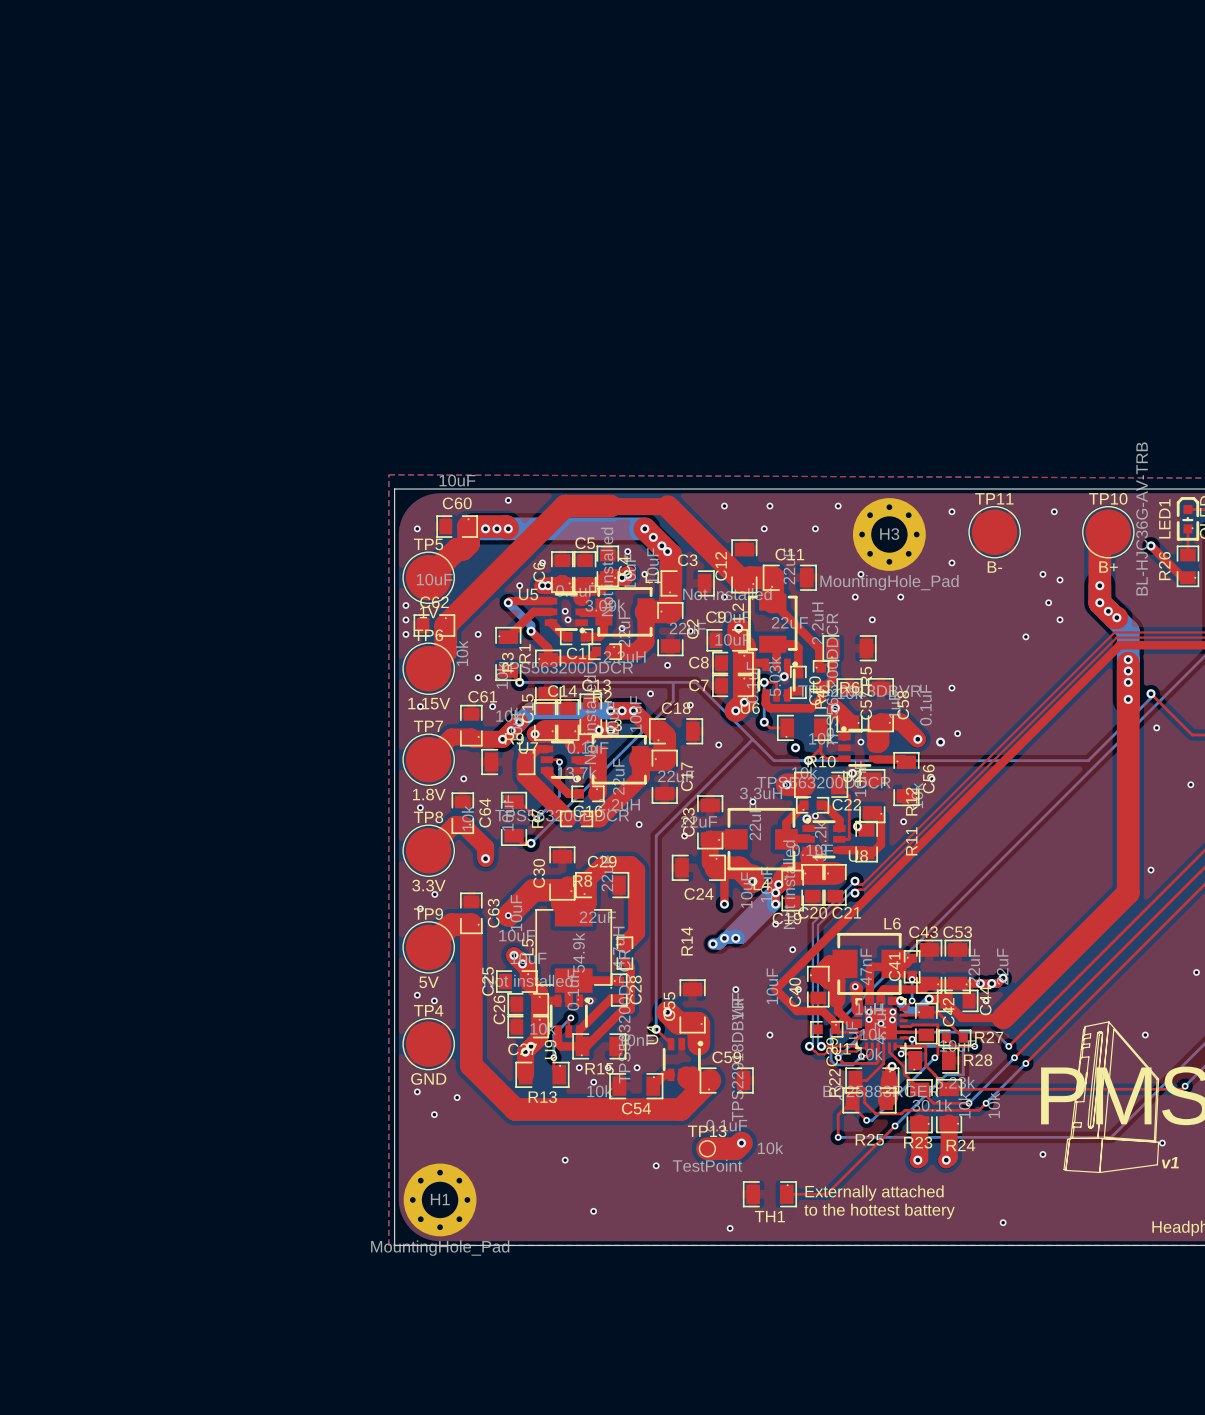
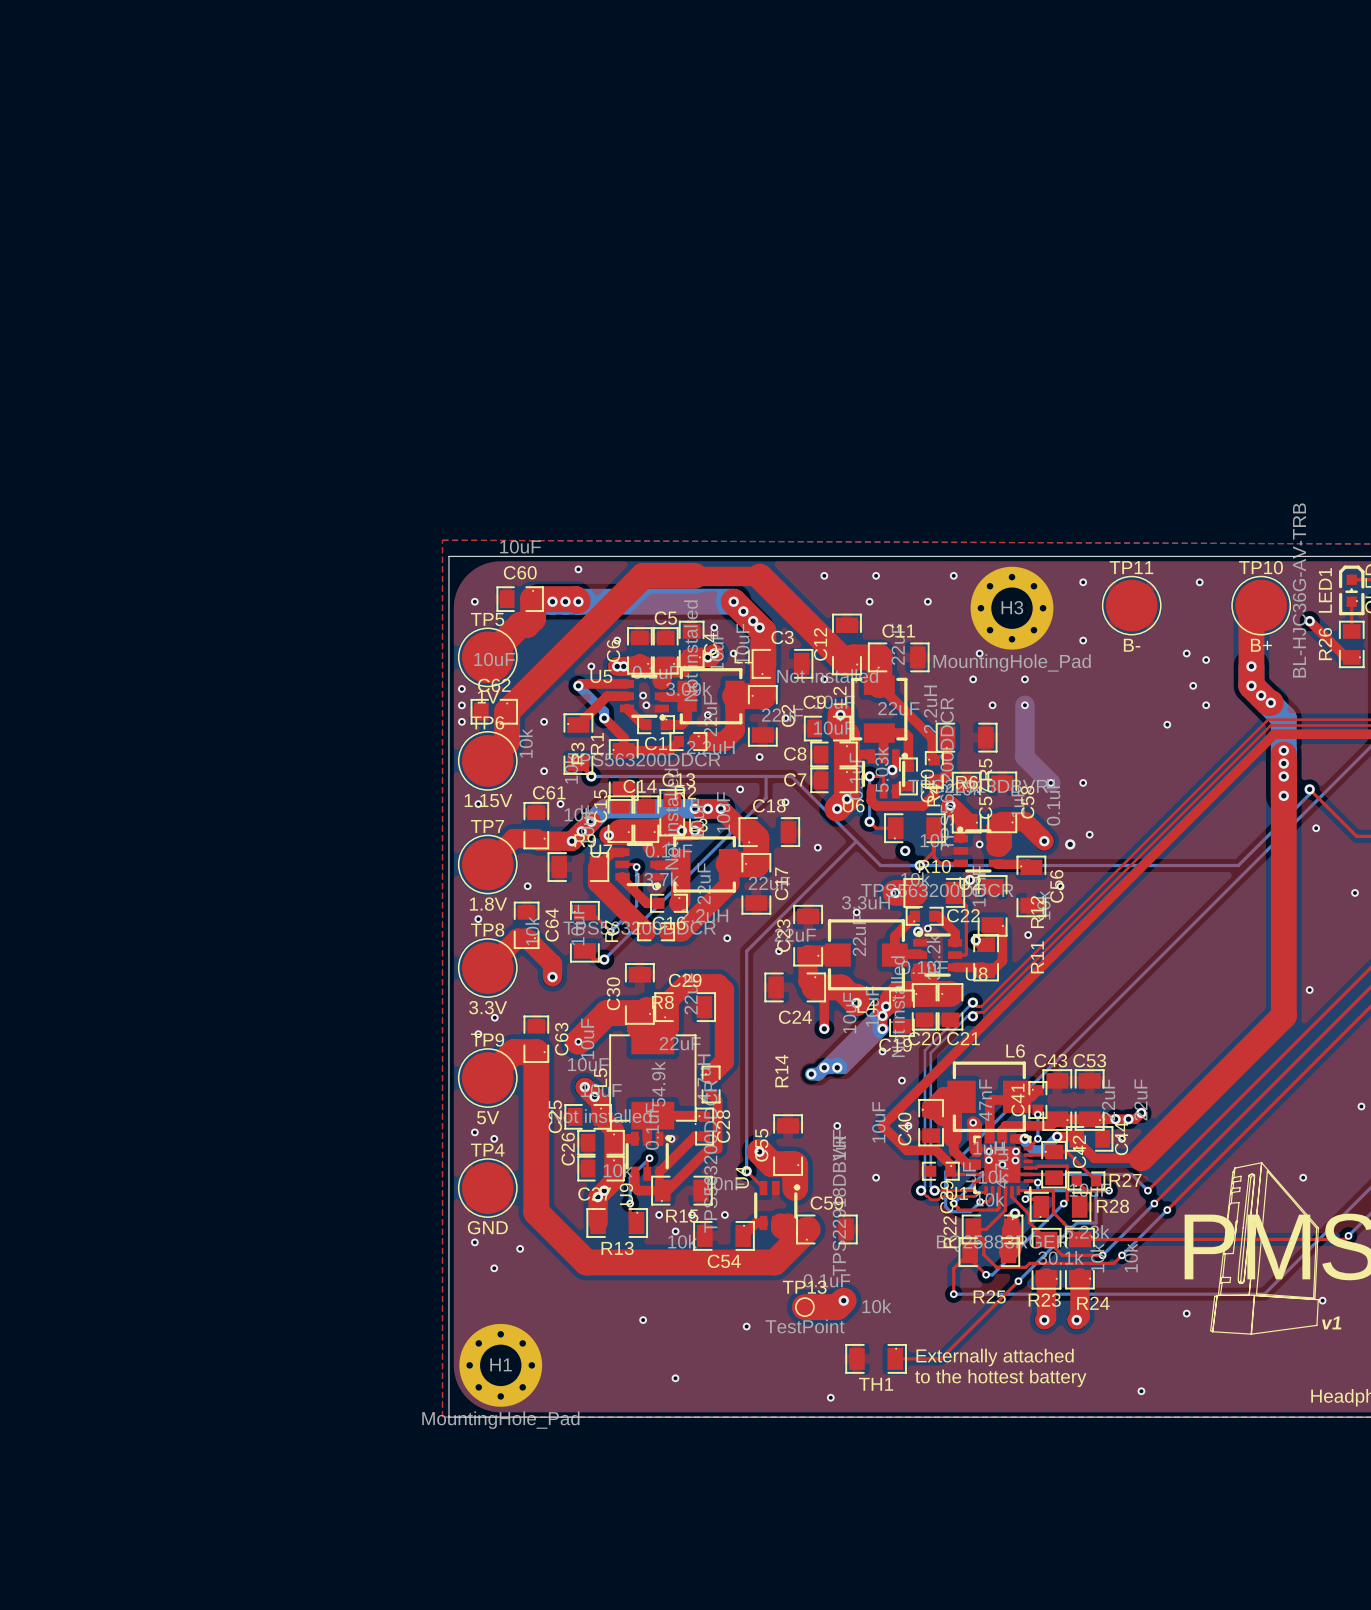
bottom track: none -> (1024, 705) (1024, 757) (1050, 782)
via: none -> (1024, 705)
via: none -> (1050, 782)

